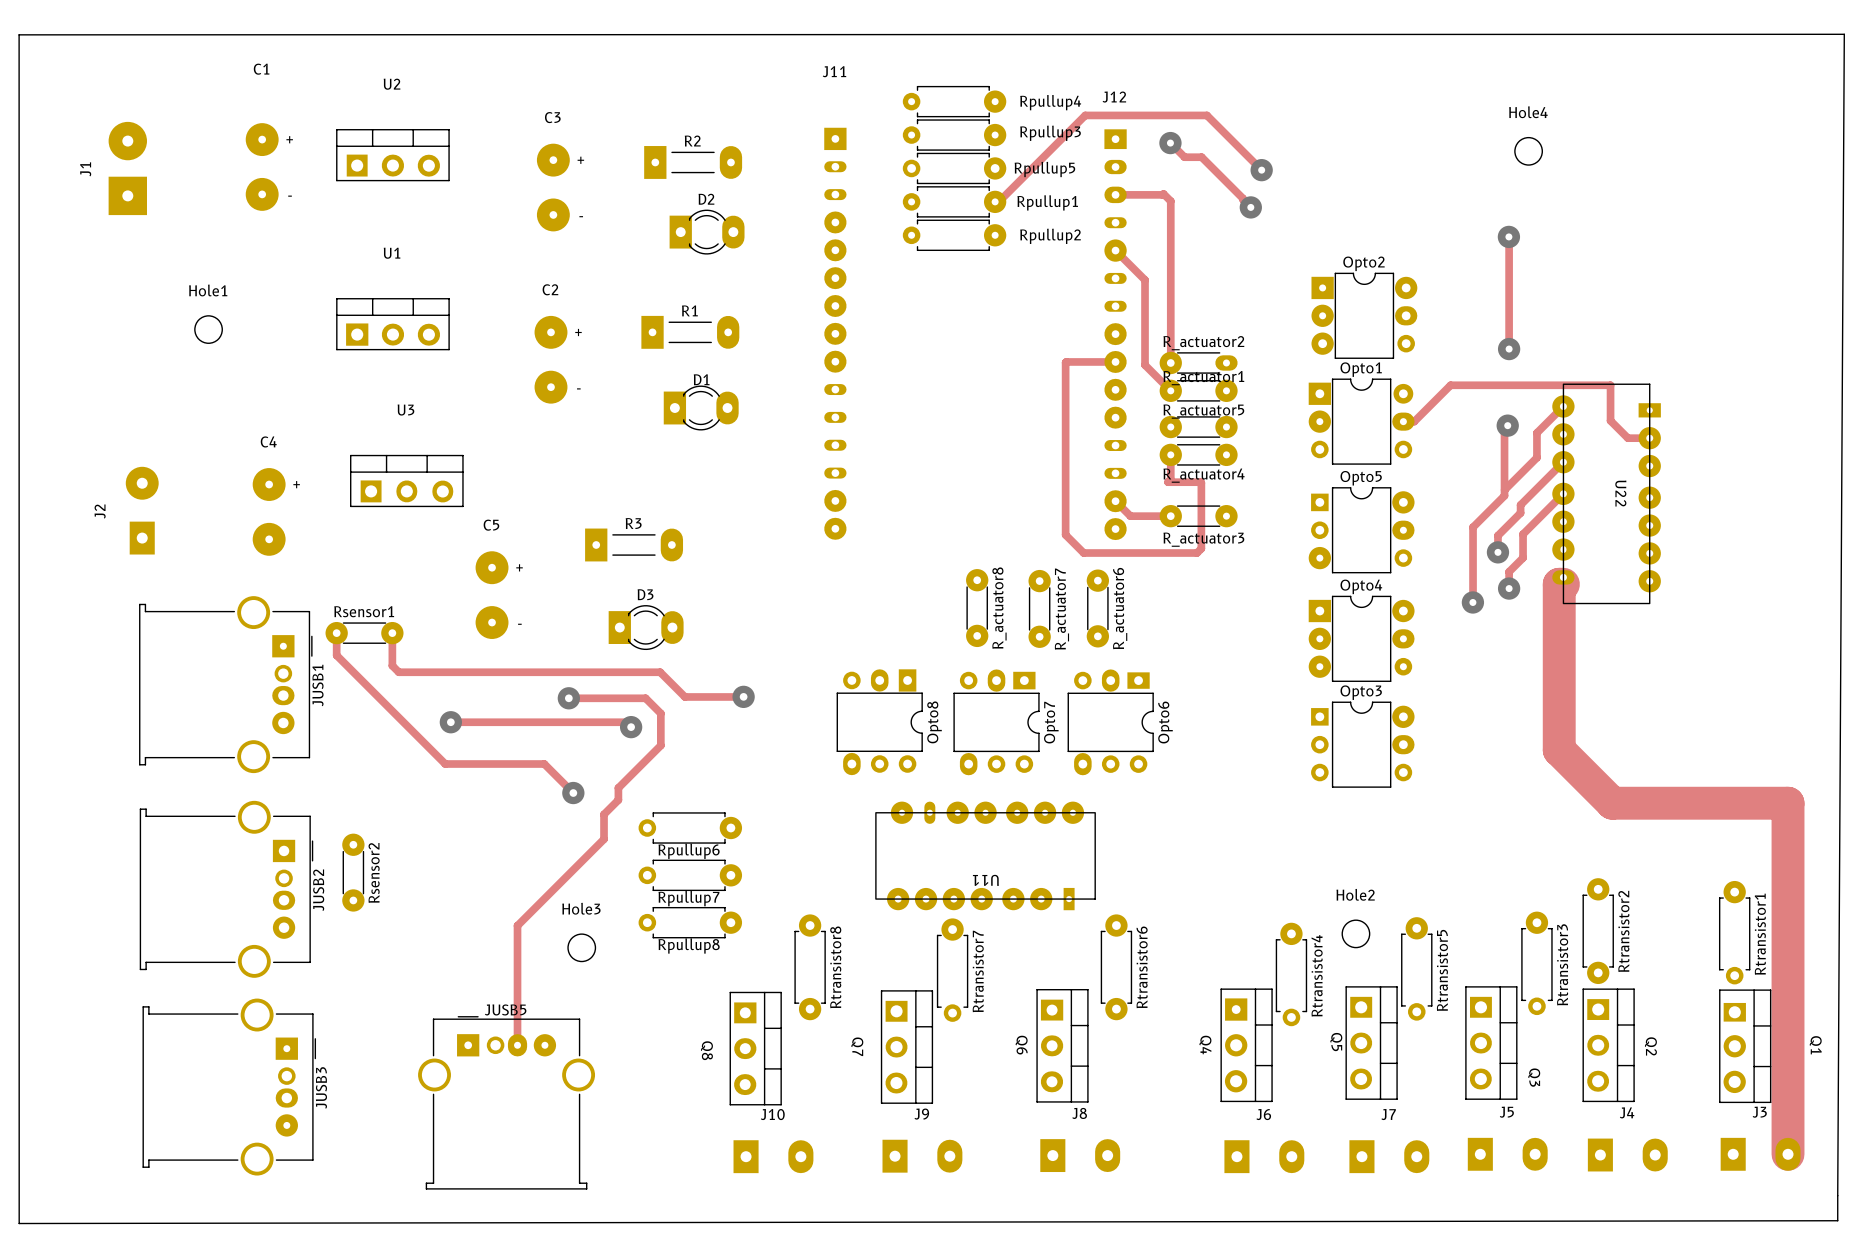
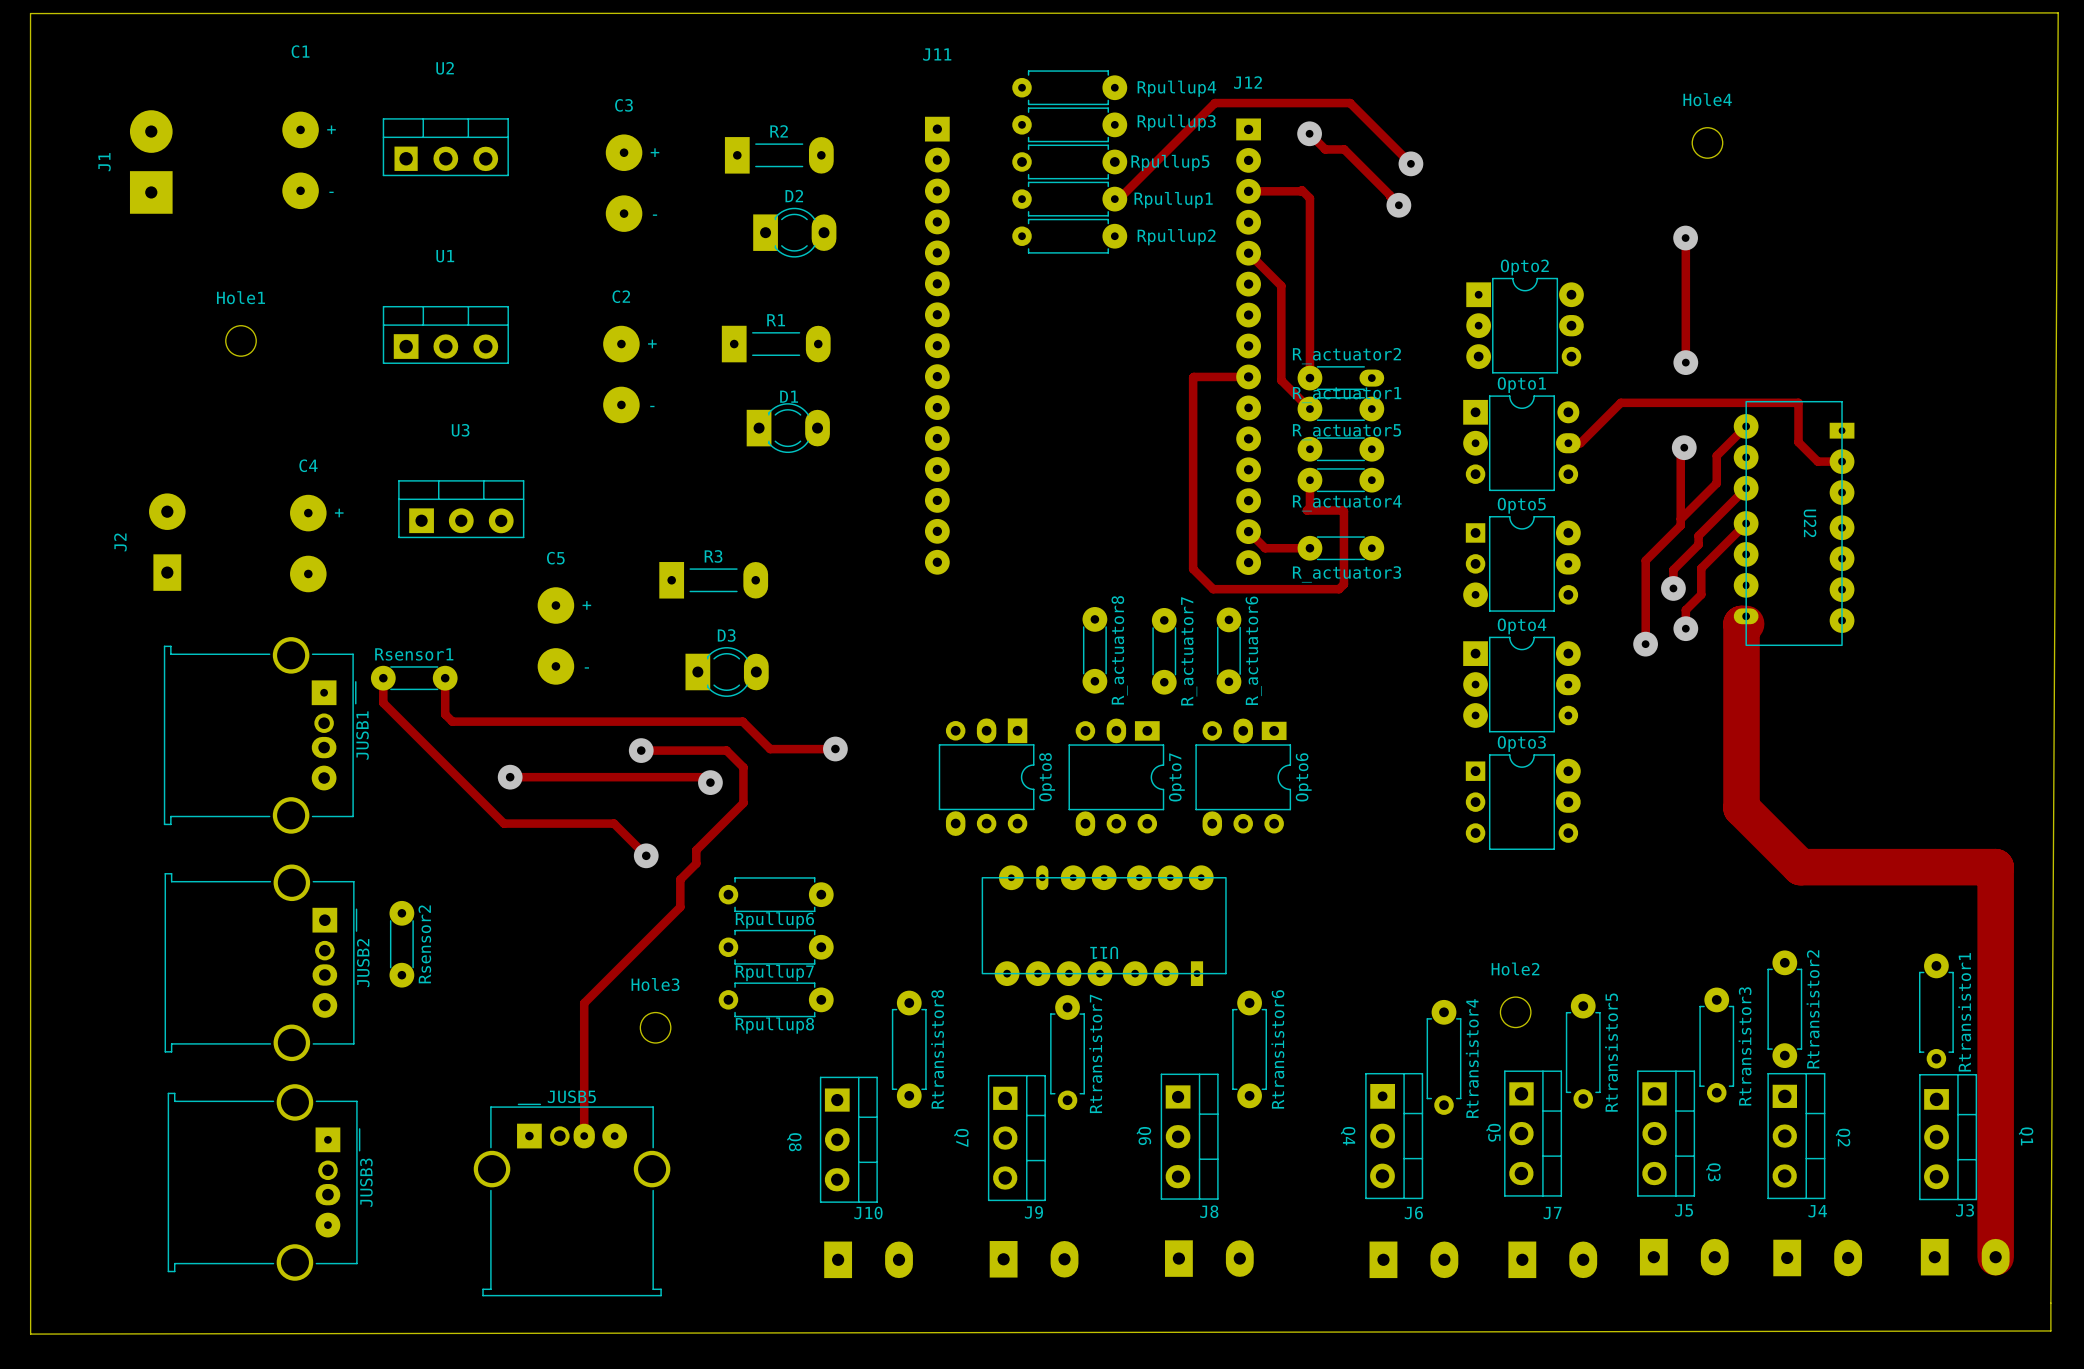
J11 footprint: [824, 127, 847, 540] -> [924, 116, 950, 575]
J12 footprint: [1104, 129, 1127, 541] -> [1236, 118, 1261, 575]
U3 footprint: [350, 454, 464, 508] -> [398, 480, 525, 539]

